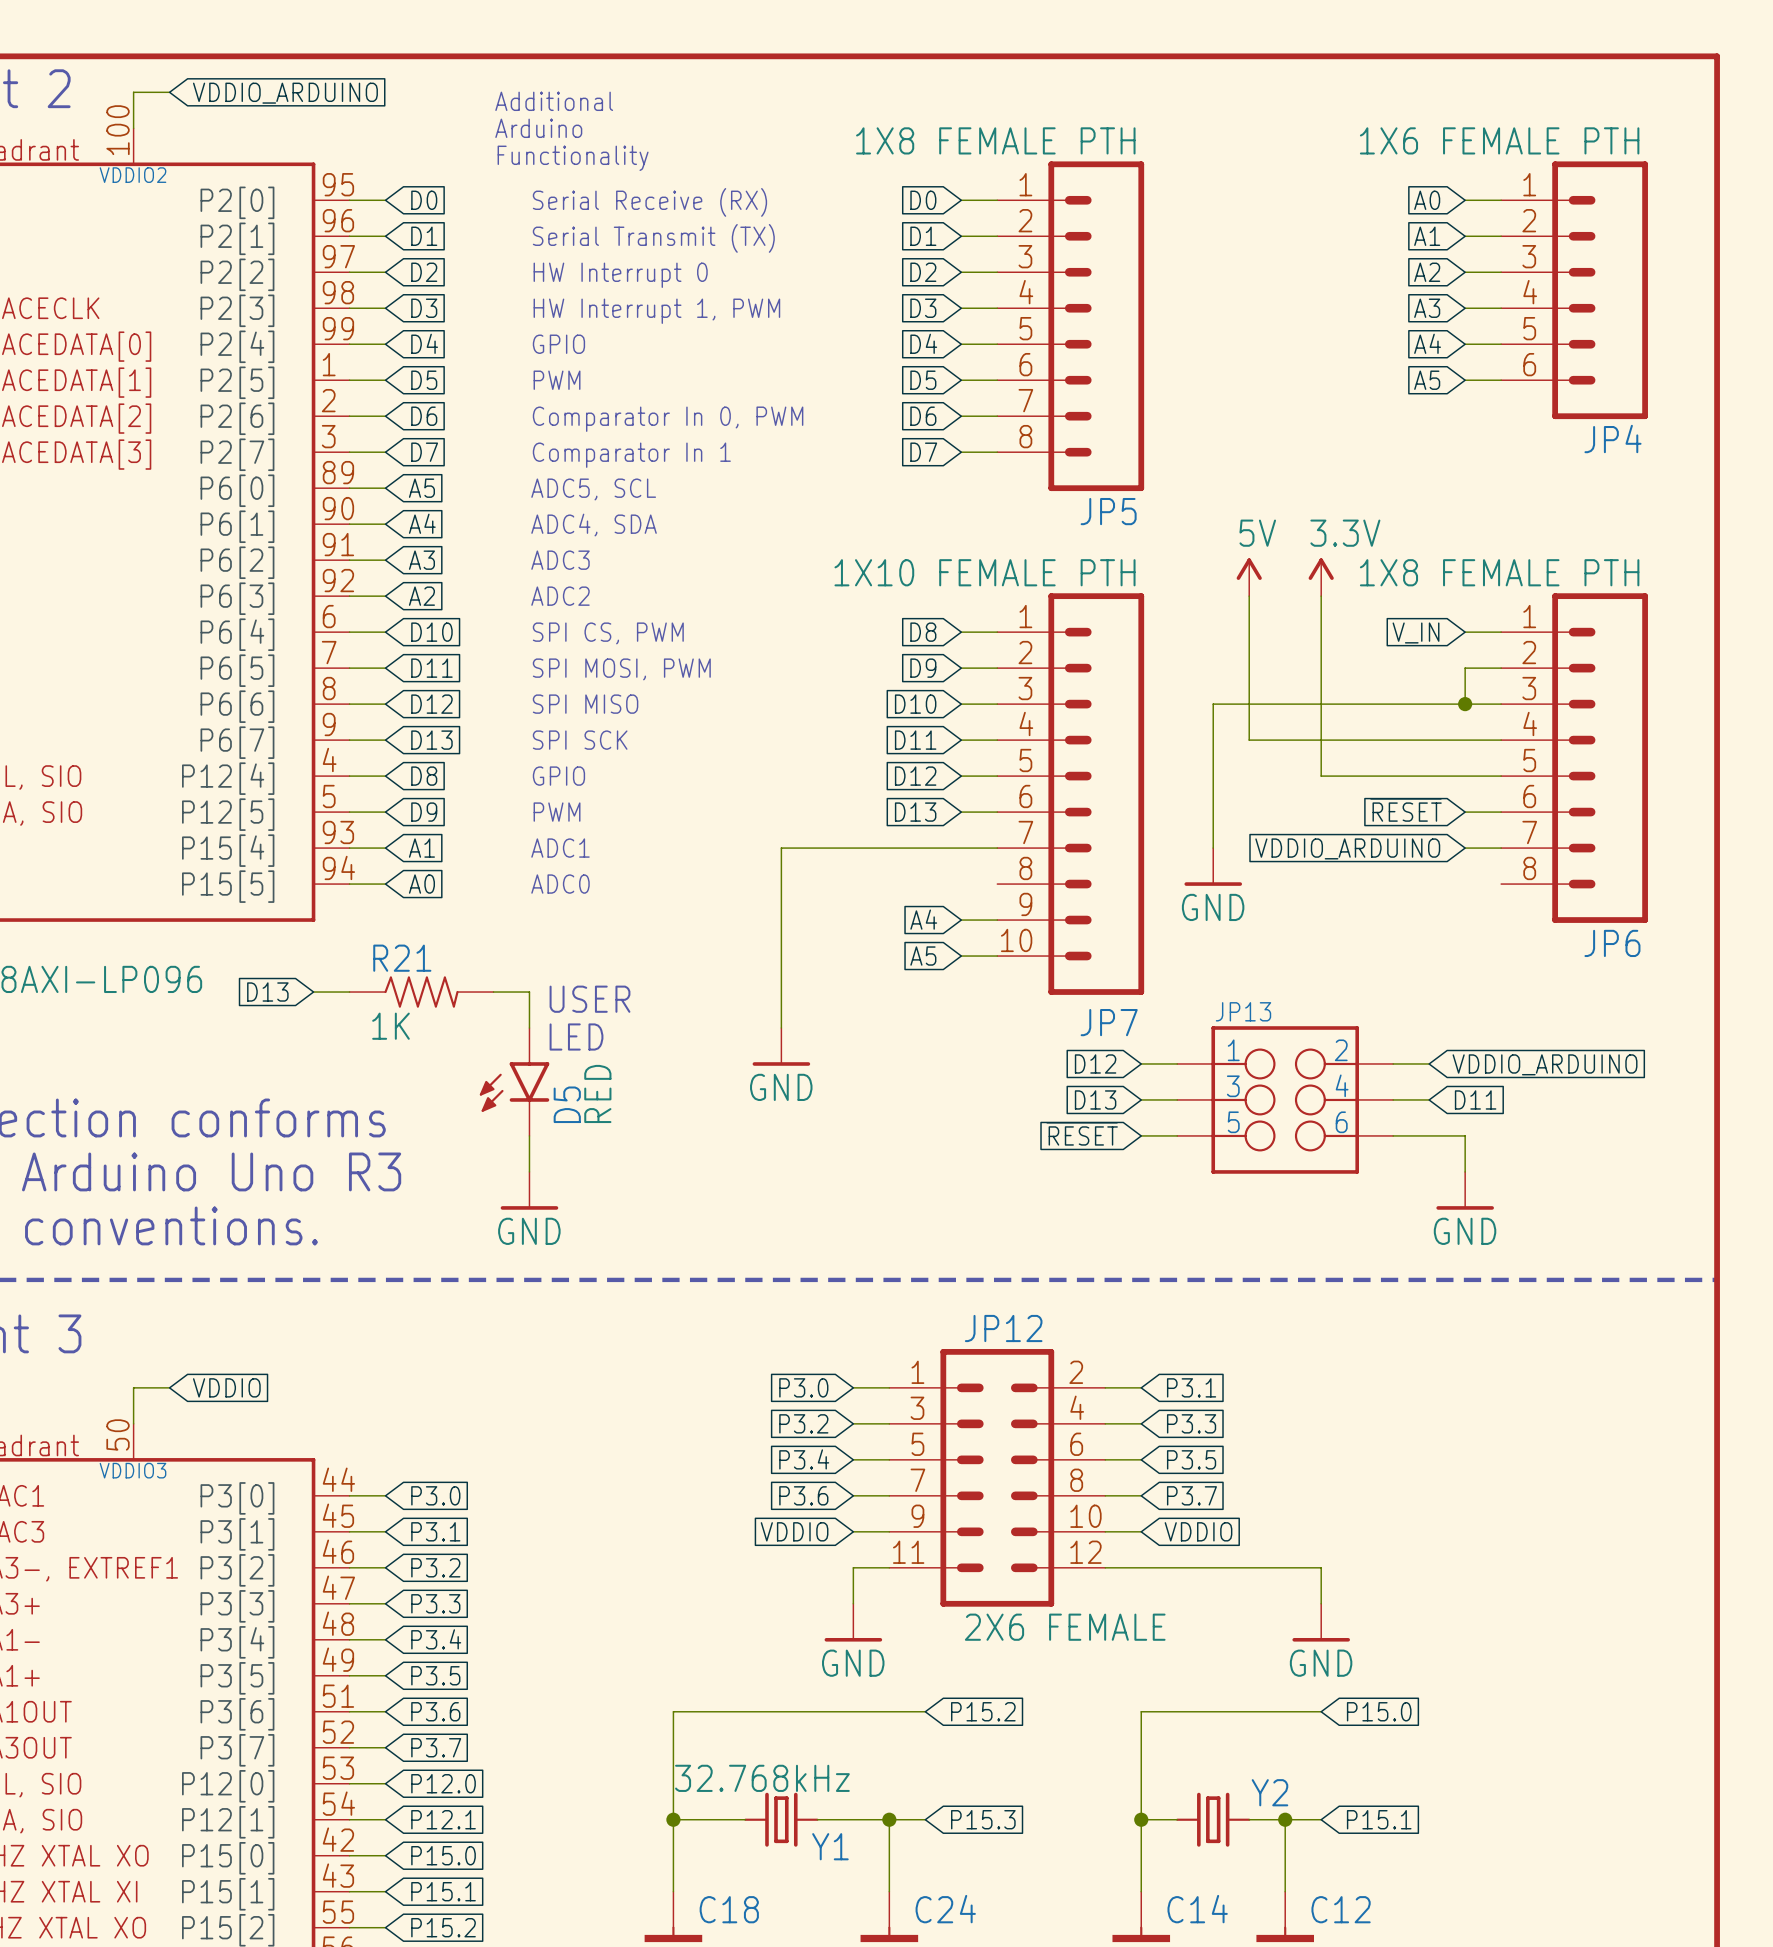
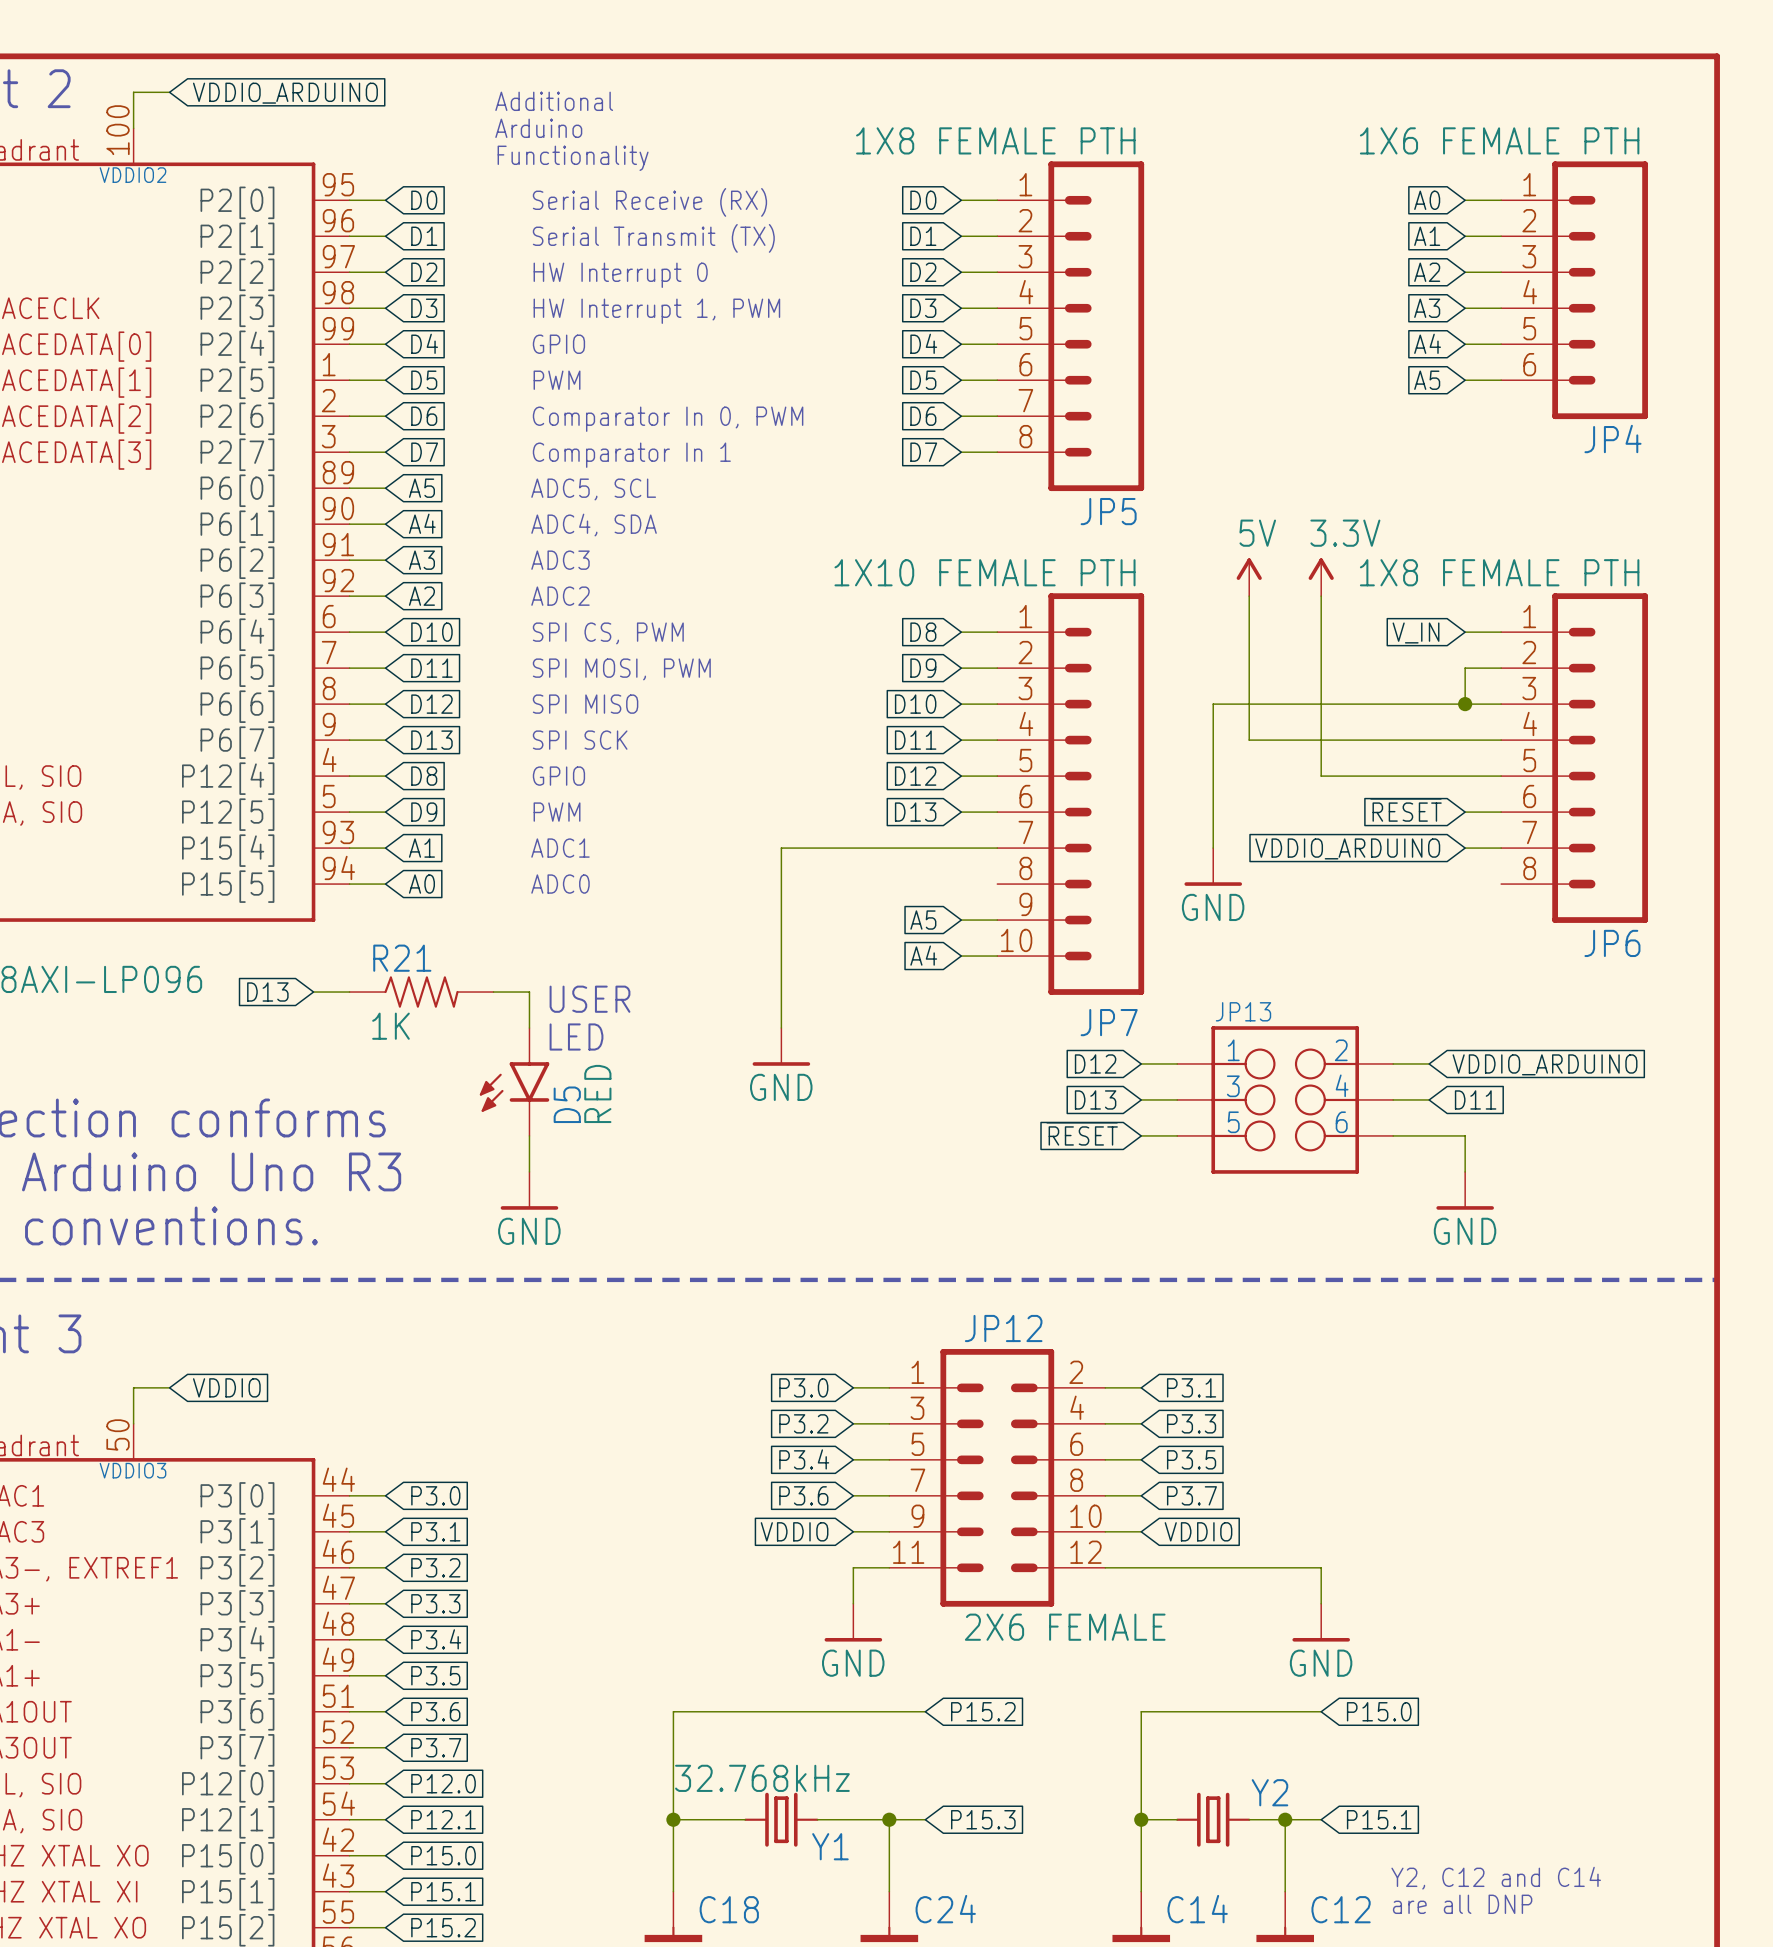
global label: A4 (923, 919) -> A5 (923, 920)
global label: A5 (923, 956) -> A4 (923, 955)
text: none -> Y2, C12 and C14 (1496, 1878)
text: none -> are all DNP (1462, 1904)

